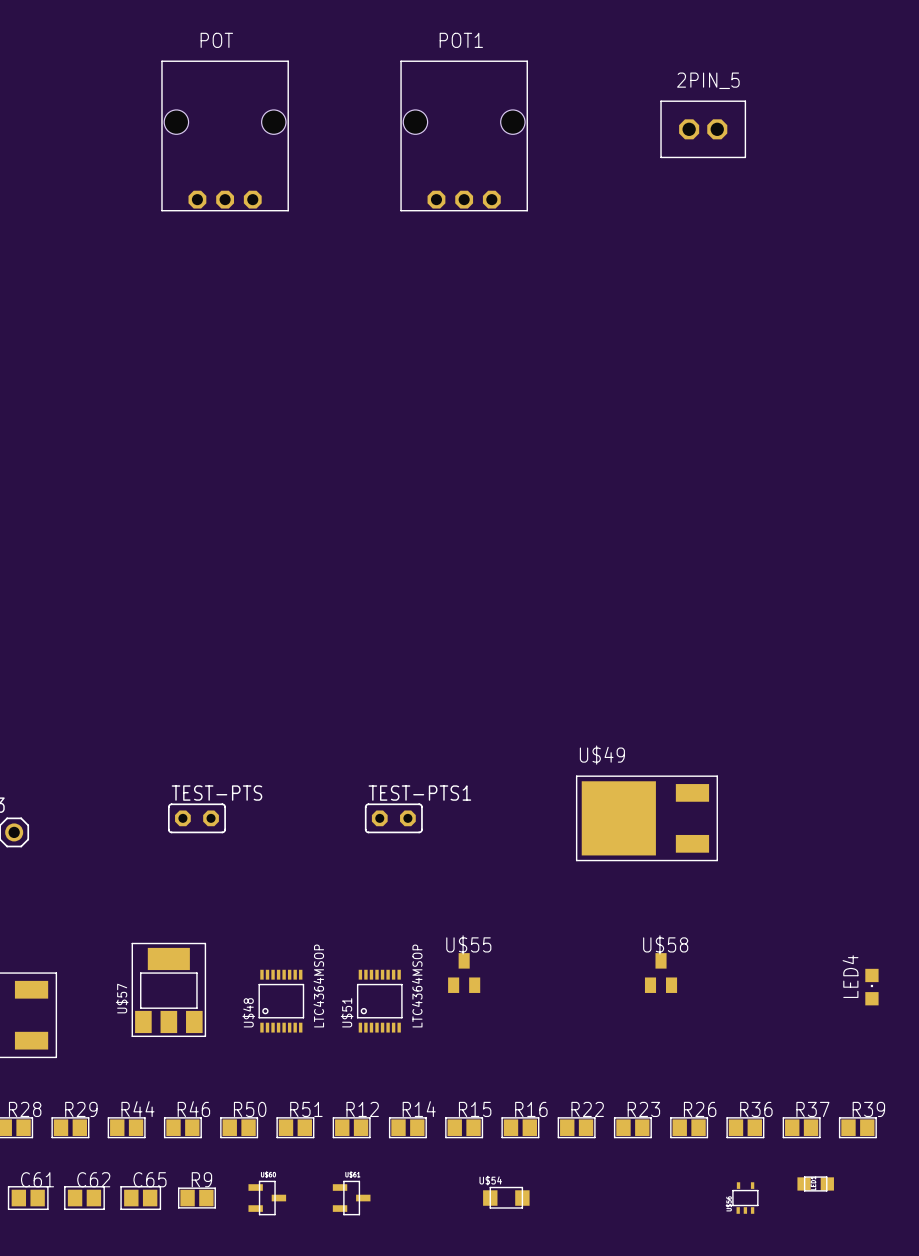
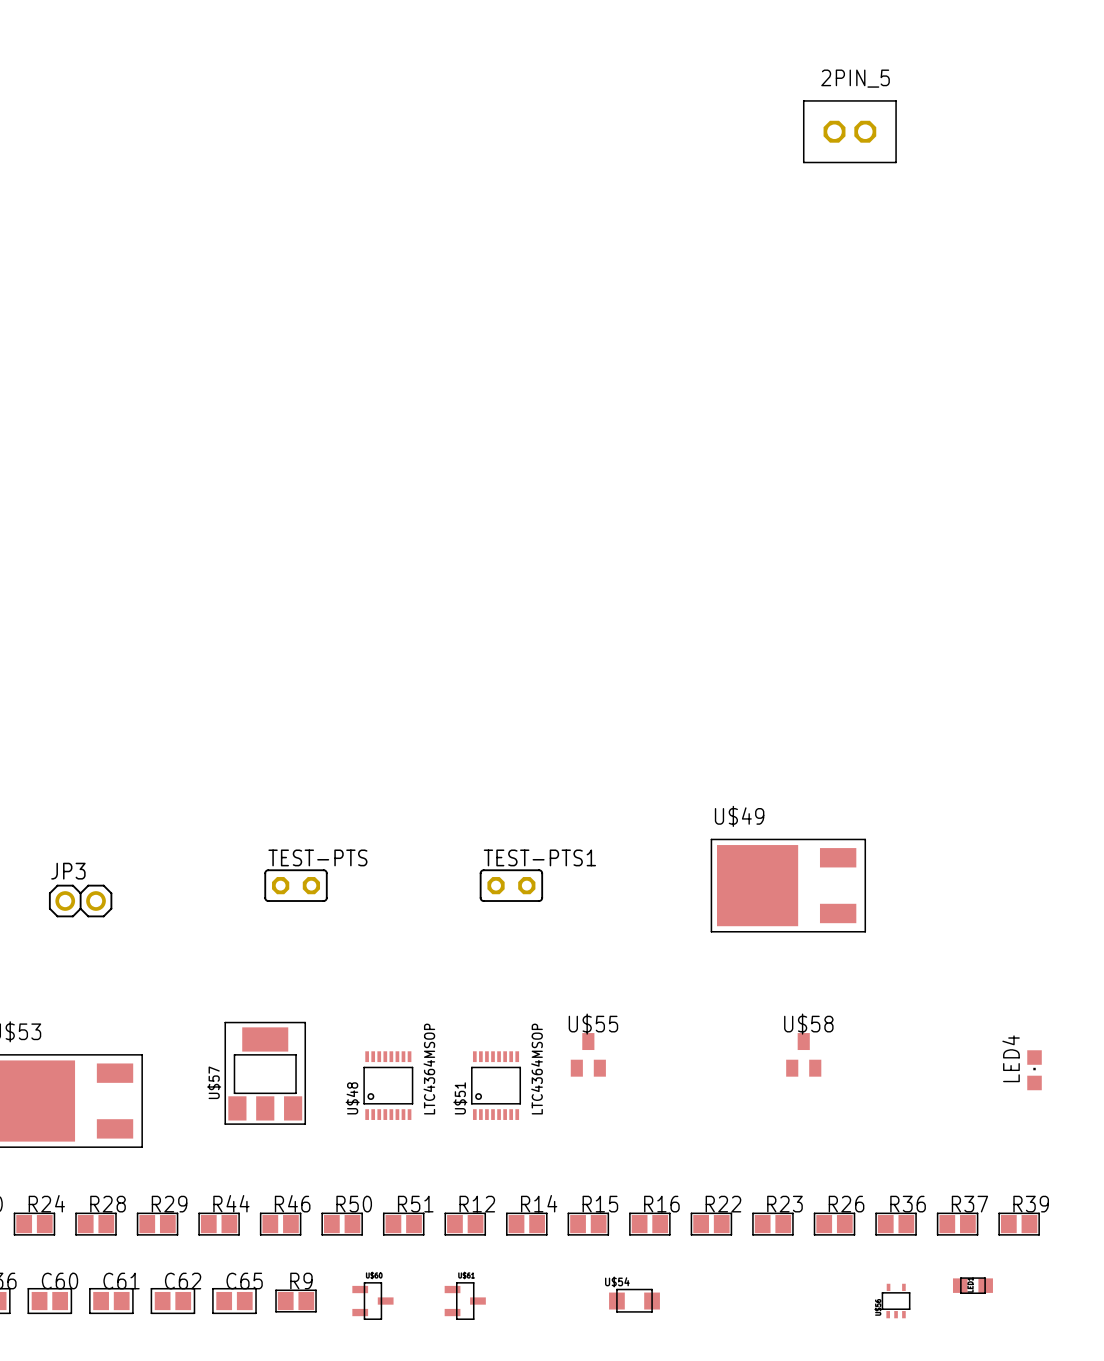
POT: (225, 135) -> none
POT1: (464, 135) -> none

